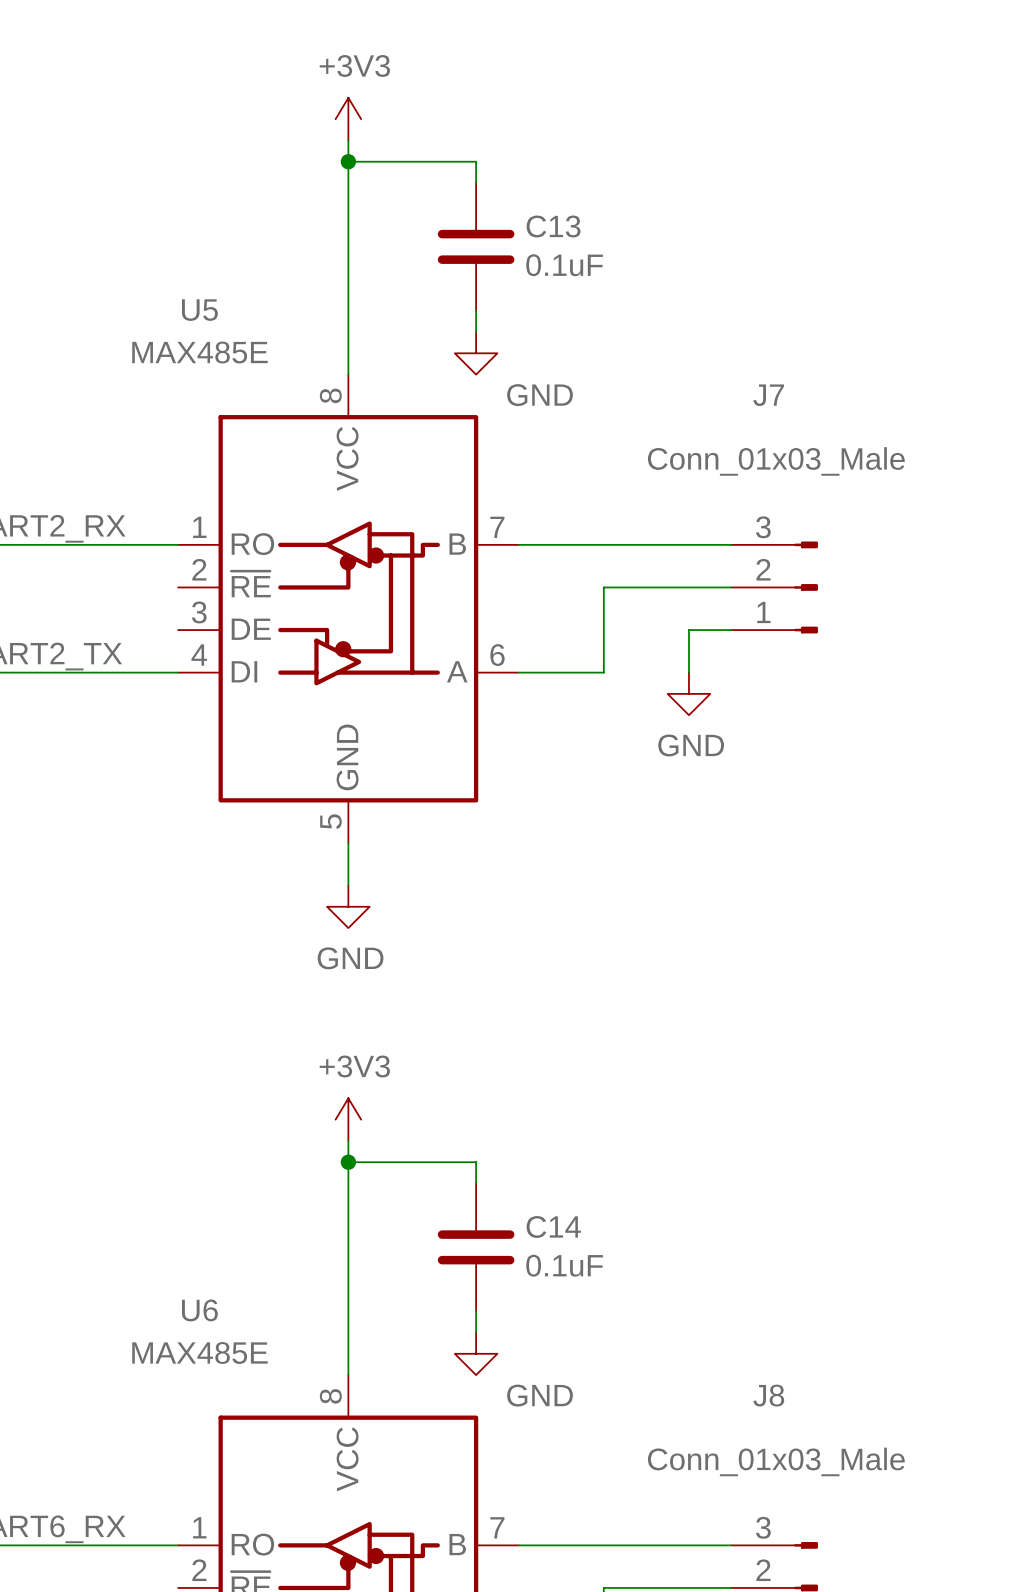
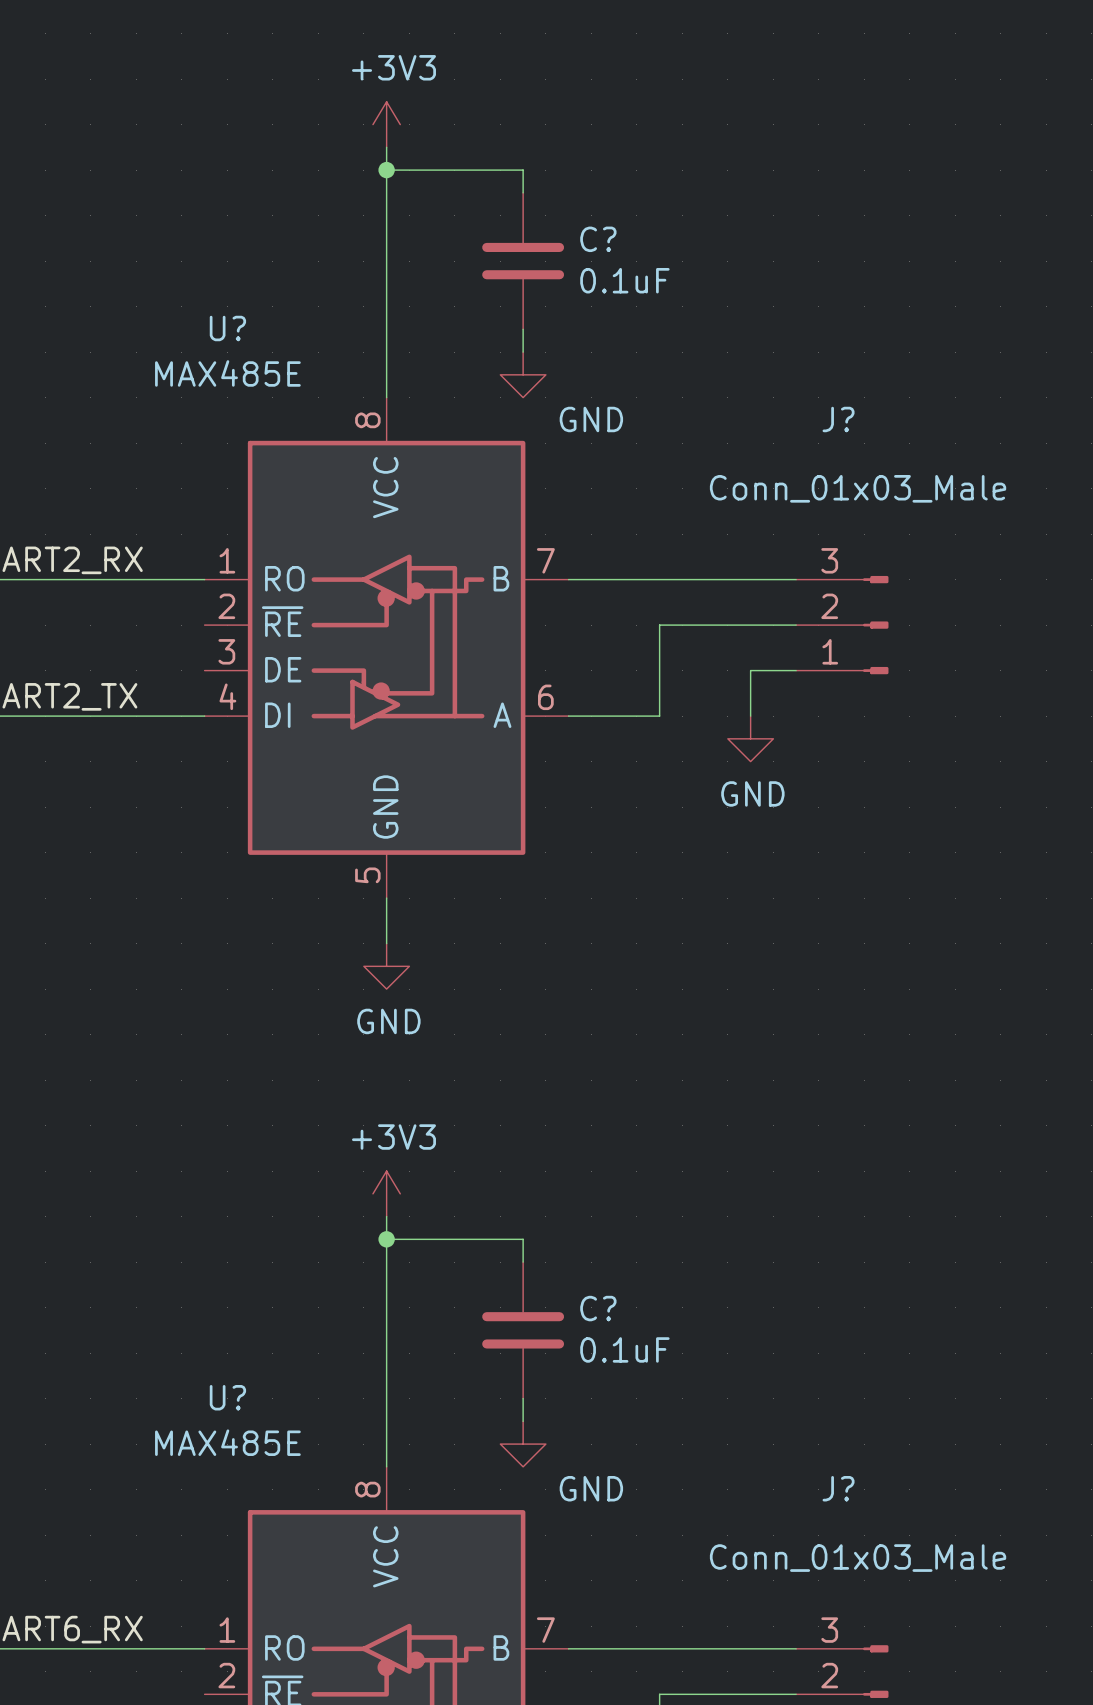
C13 name: C13 (553, 226) -> C? (598, 239)
U5 name: U5 (199, 310) -> U? (227, 328)
J7 name: J7 (768, 395) -> J? (838, 419)
C14 name: C14 (553, 1226) -> C? (598, 1308)
U6 name: U6 (199, 1310) -> U? (227, 1397)
J8 name: J8 (768, 1395) -> J? (838, 1488)

